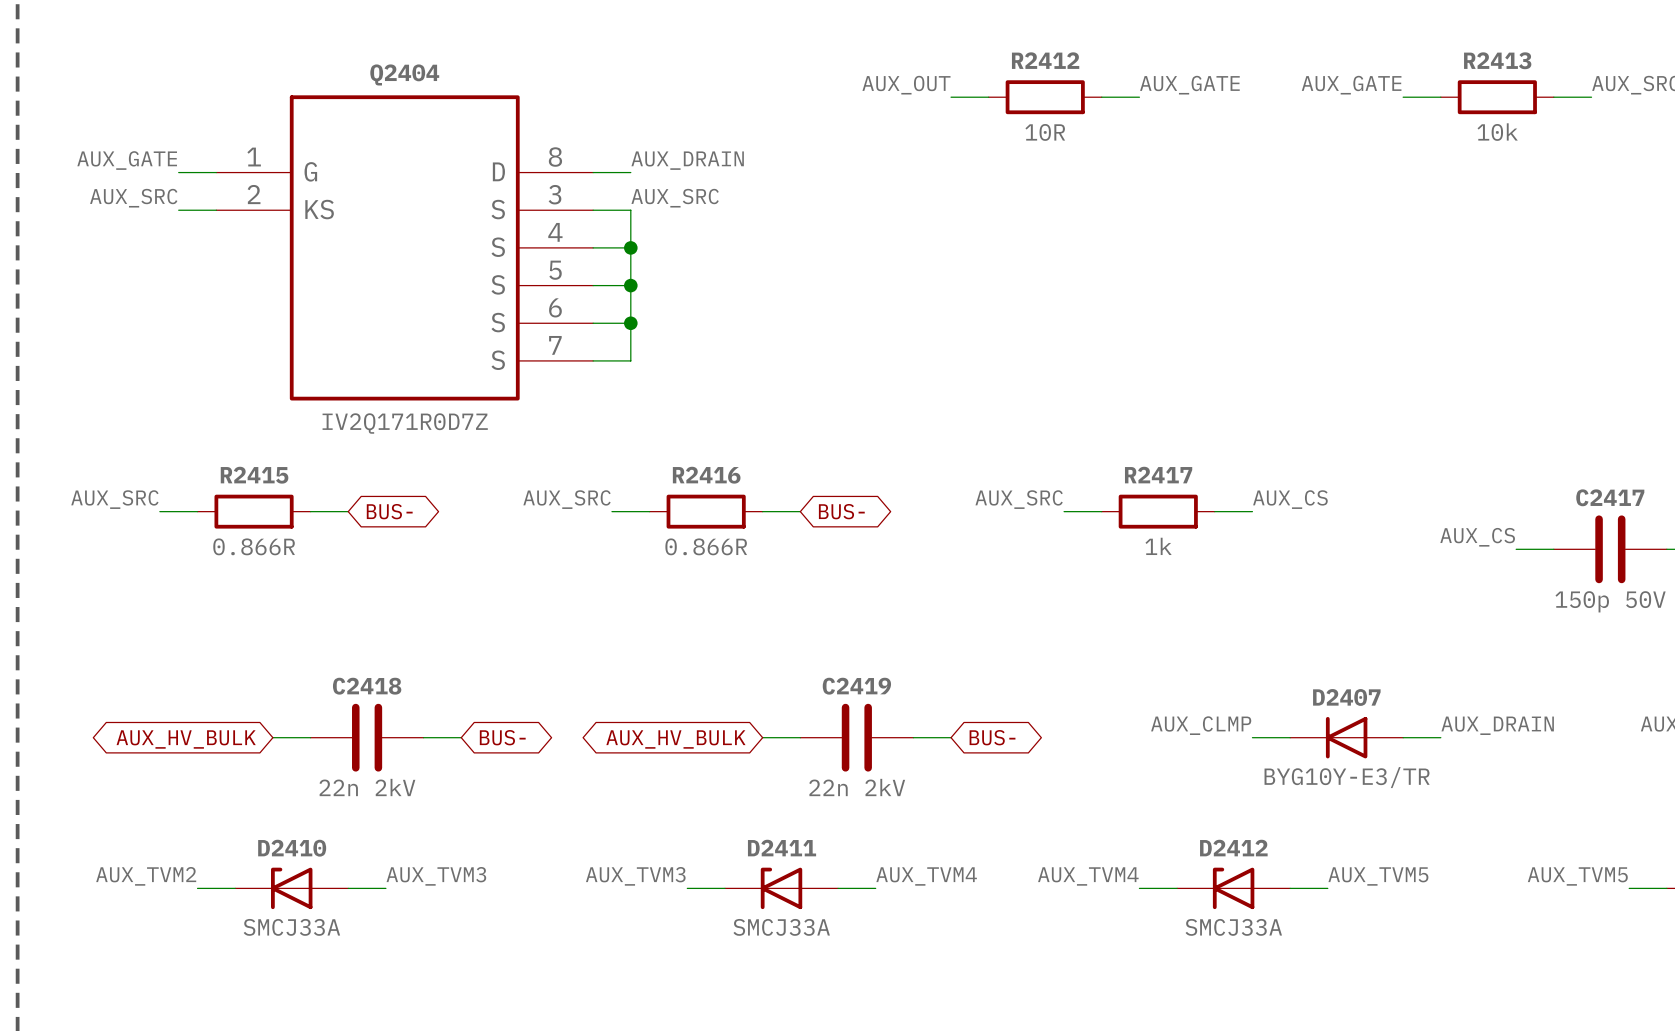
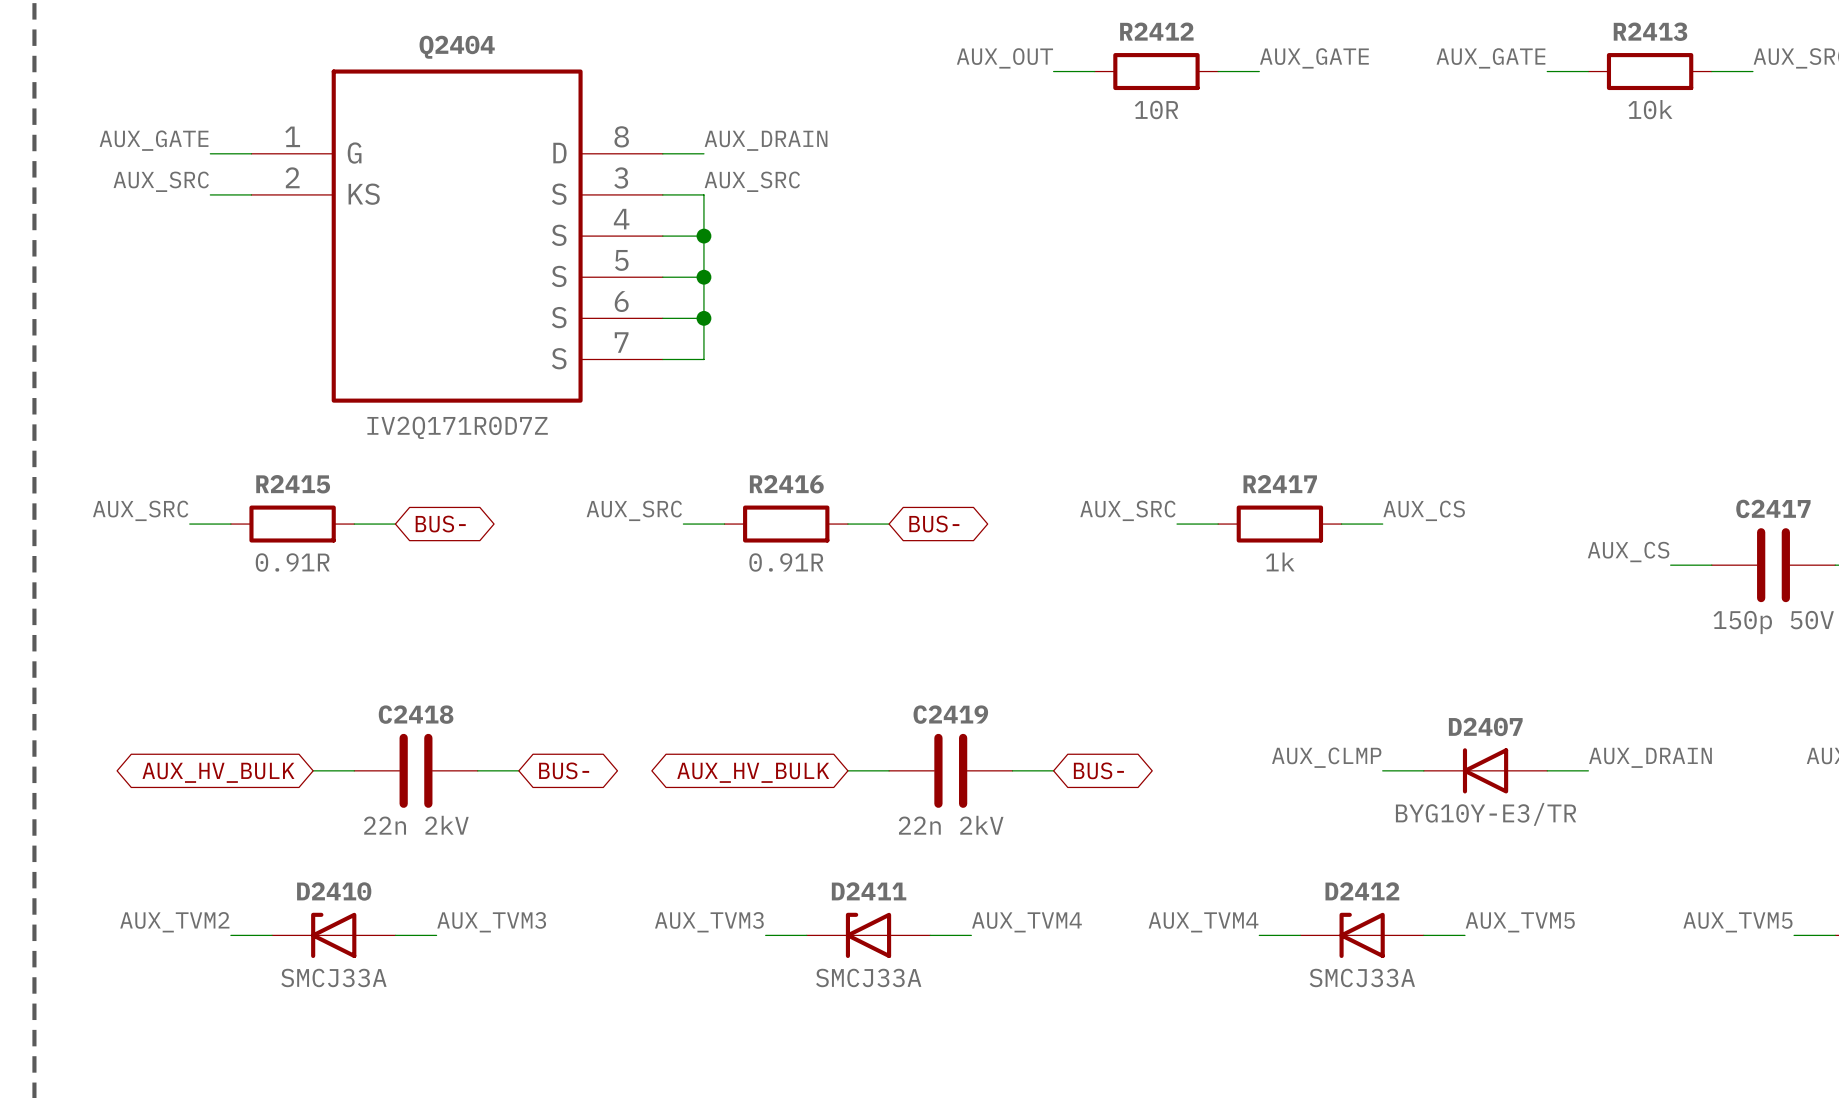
R2415 value: 0.866R (254, 546) -> 0.91R (292, 562)
R2416 value: 0.866R (706, 546) -> 0.91R (786, 562)

